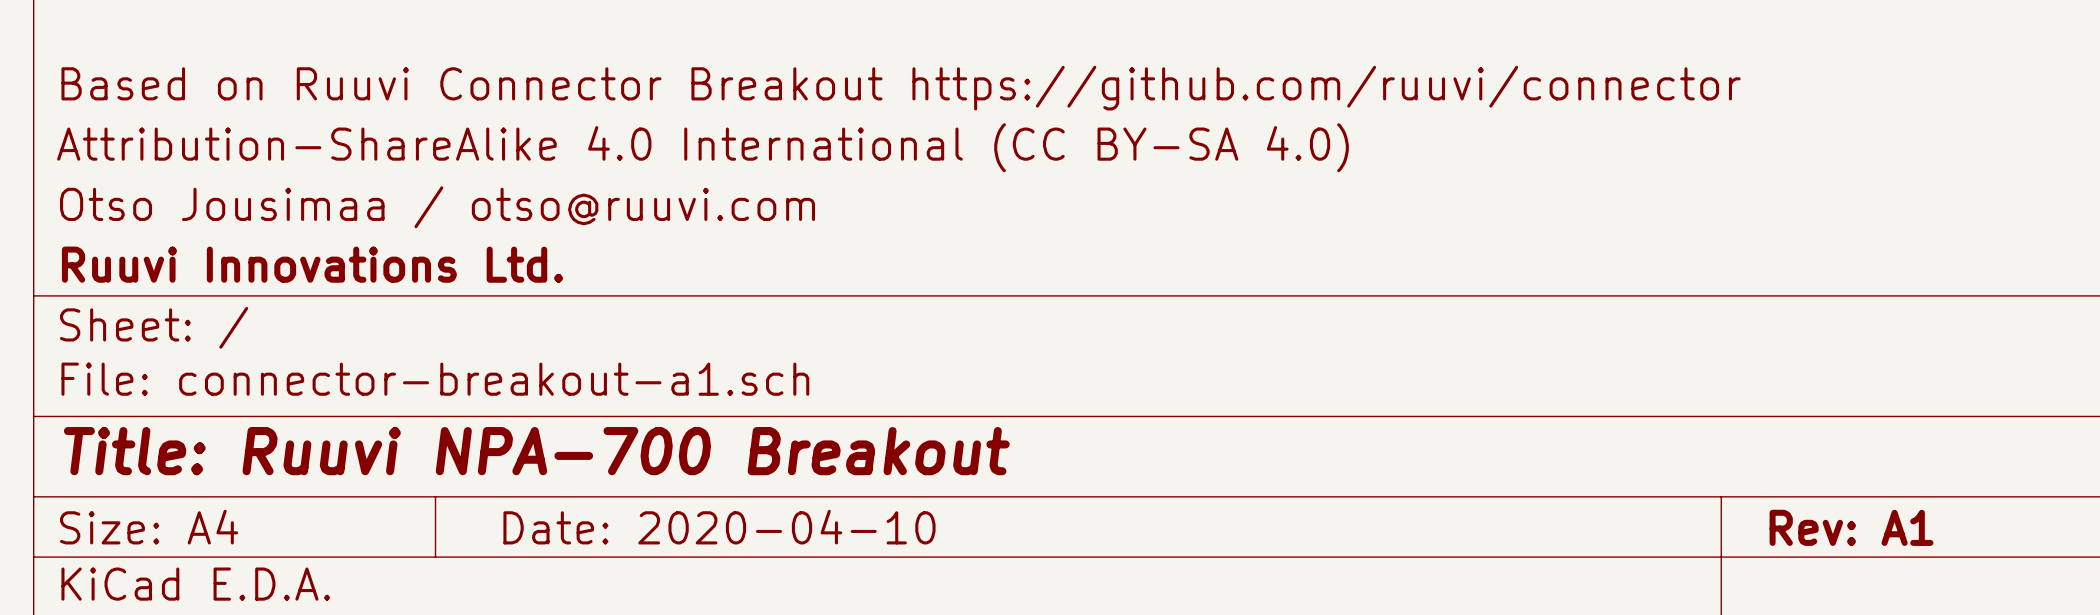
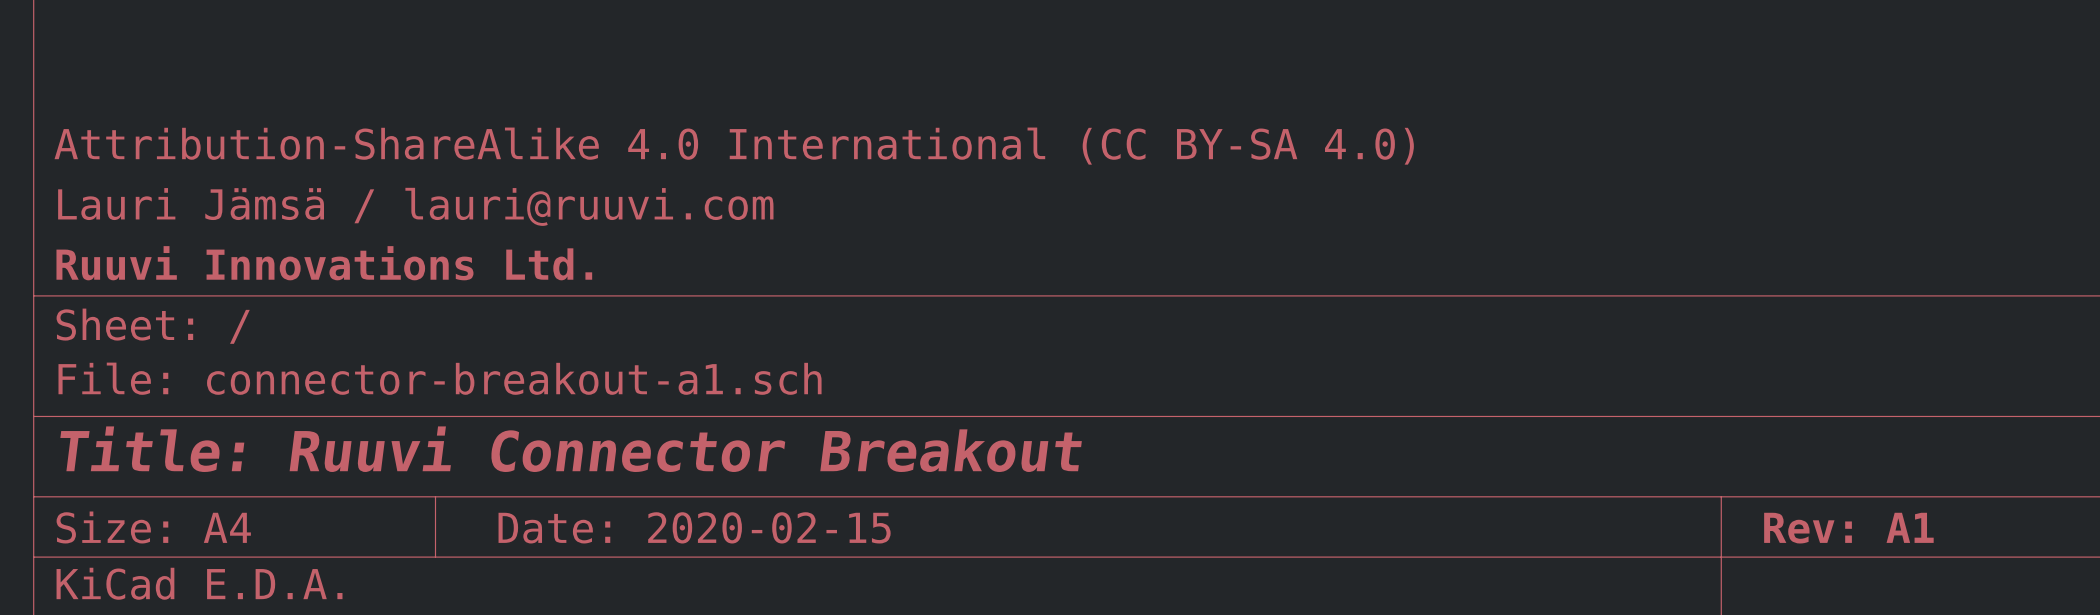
title block: Based on Ruuvi Connector Breakout https://github.com/ruuvi/connector (901, 88) -> none
title block: Otso Jousimaa / otso@ruuvi.com (437, 207) -> Lauri Jämsä / lauri@ruuvi.com (415, 206)
title block: Title: Ruuvi NPA-700 Breakout (536, 451) -> Title: Ruuvi Connector Breakout (571, 449)
title block: Date: 2020-04-10 (719, 527) -> Date: 2020-02-15 (694, 527)

